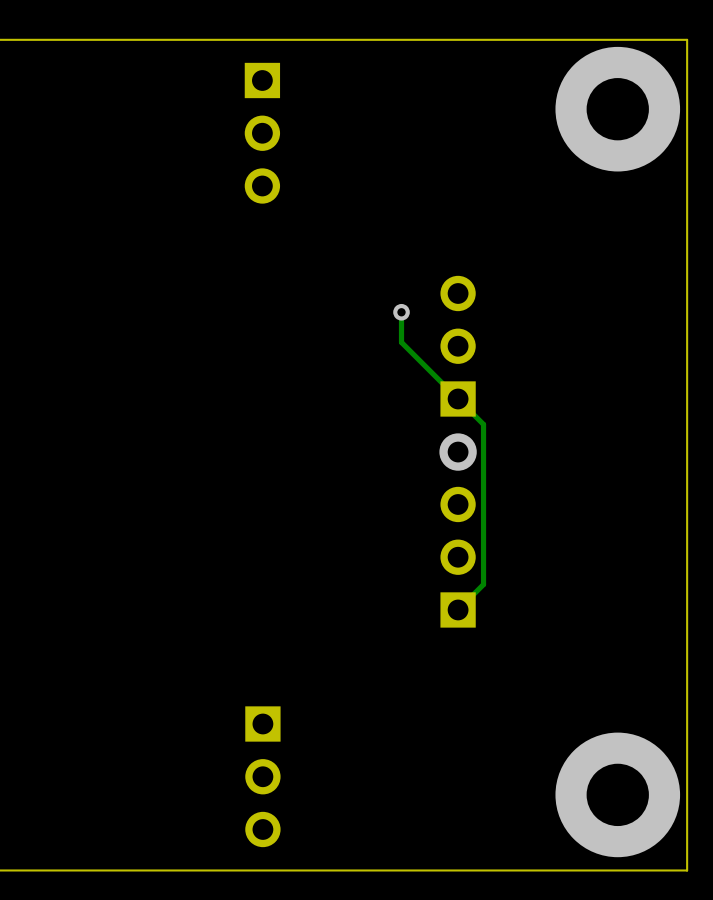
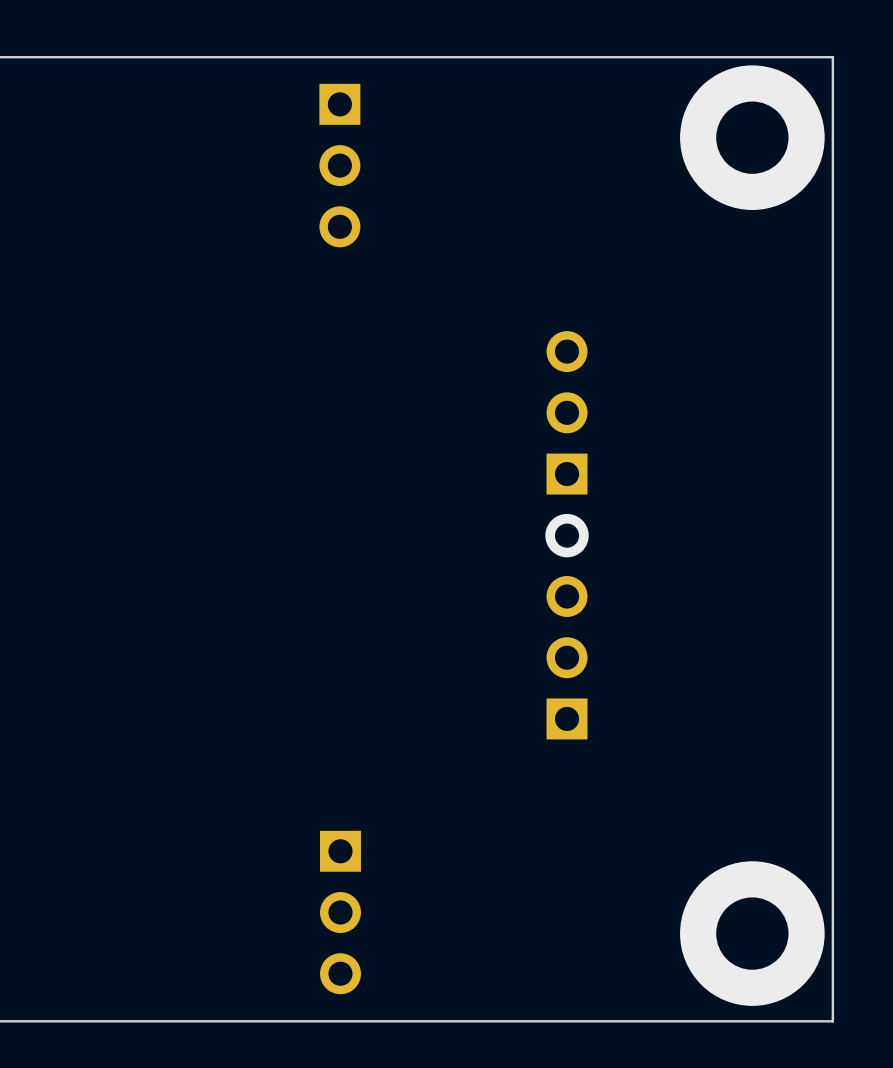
track: (401, 312) (401, 342) (483, 424) (483, 584) (458, 609) -> none
via: (401, 312) -> none

